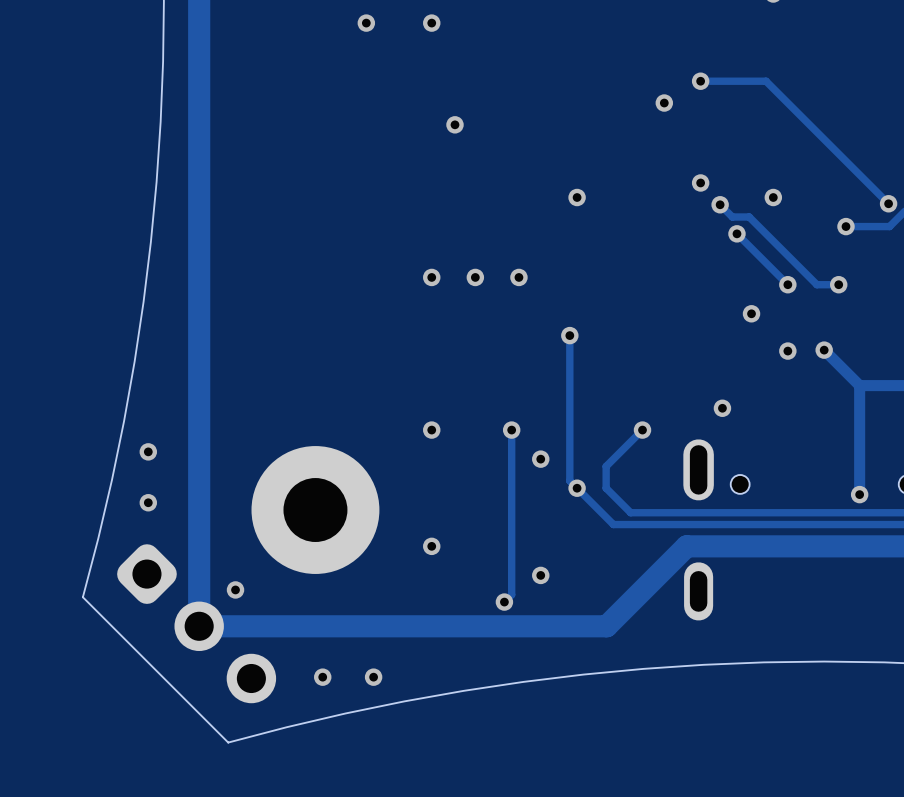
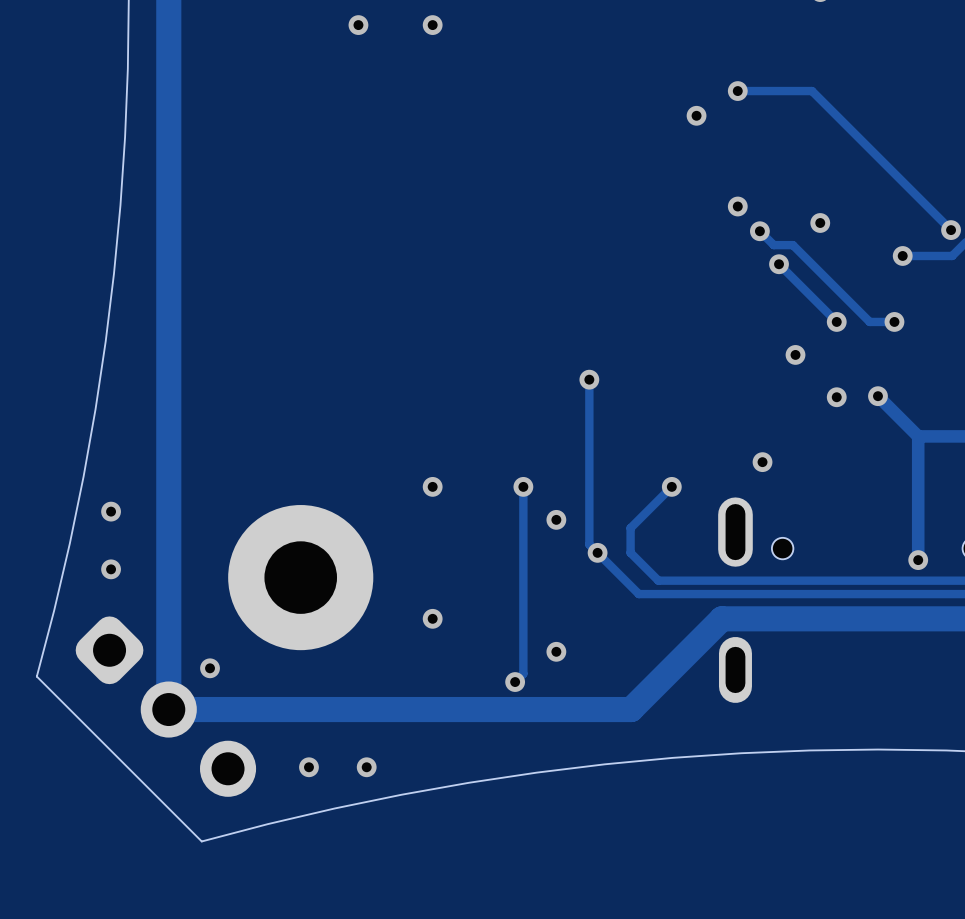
via: (454, 124) -> none
via: (577, 197) -> none
via: (431, 277) -> none
via: (475, 277) -> none
via: (518, 277) -> none

